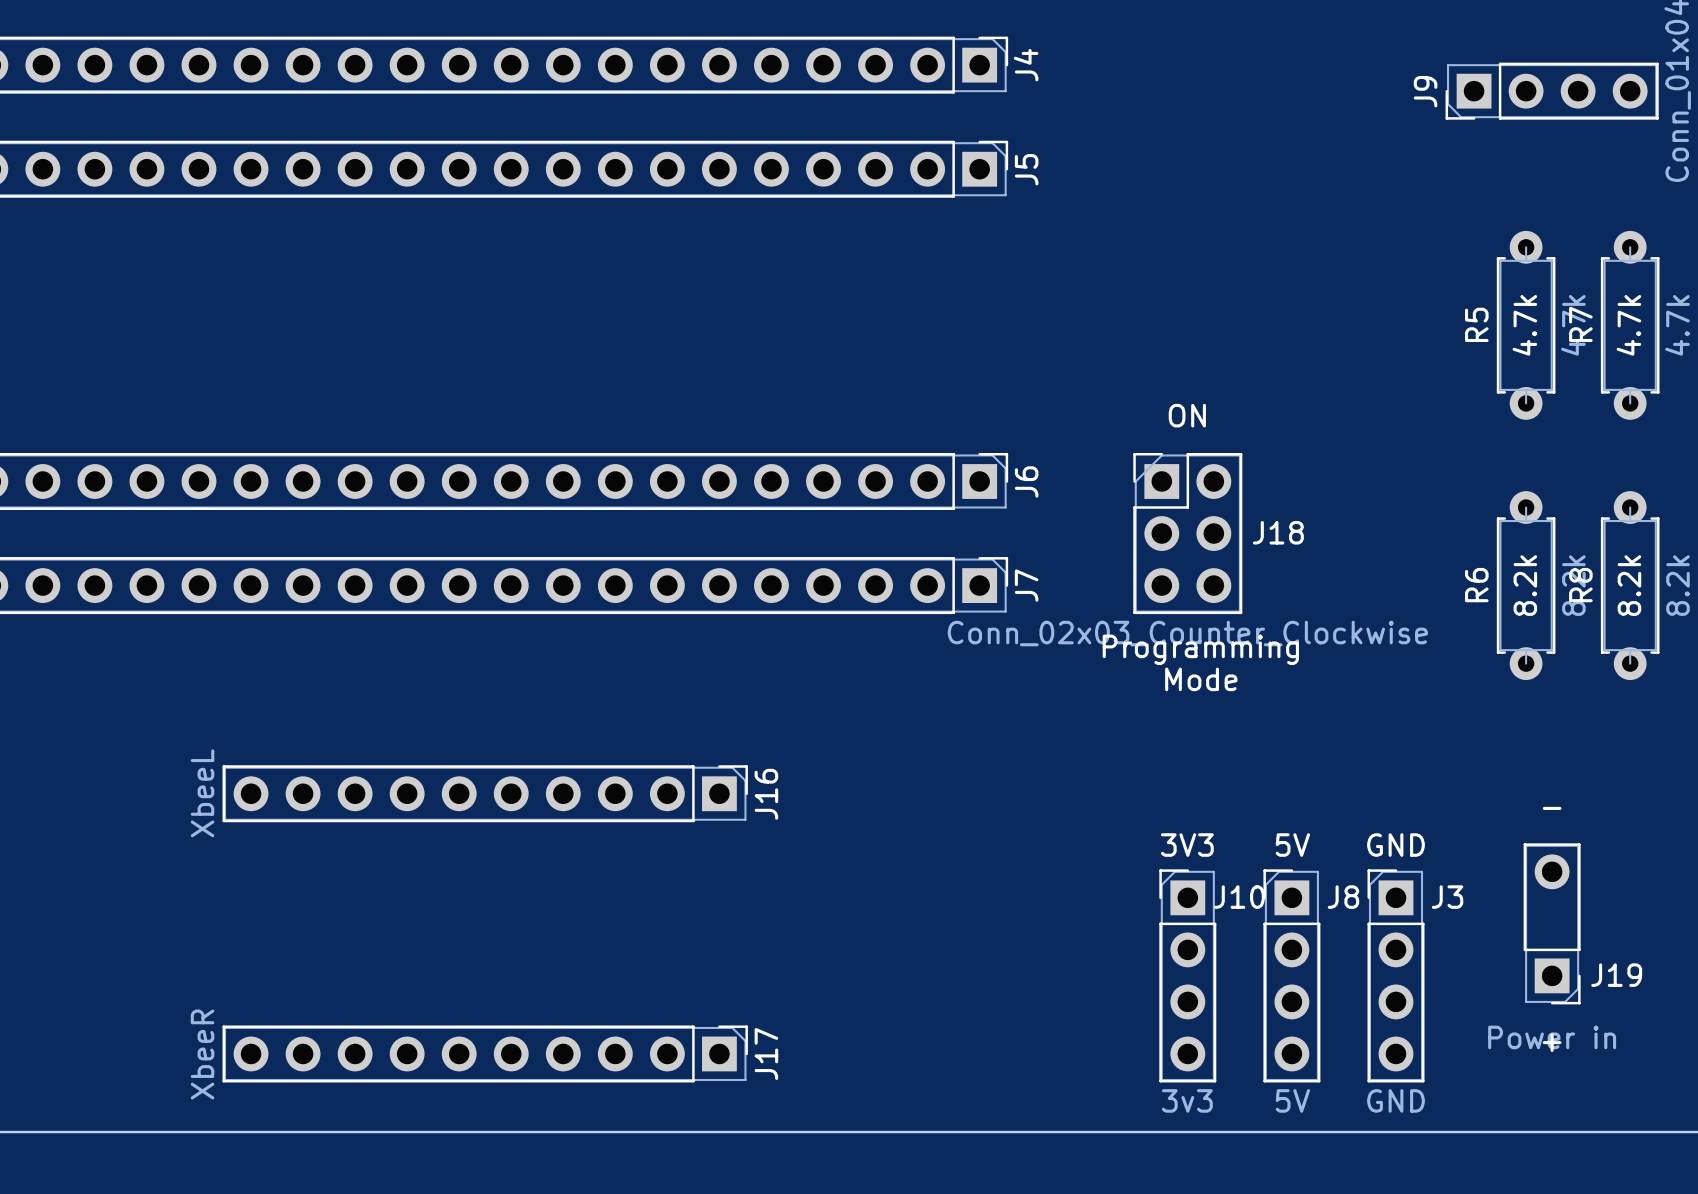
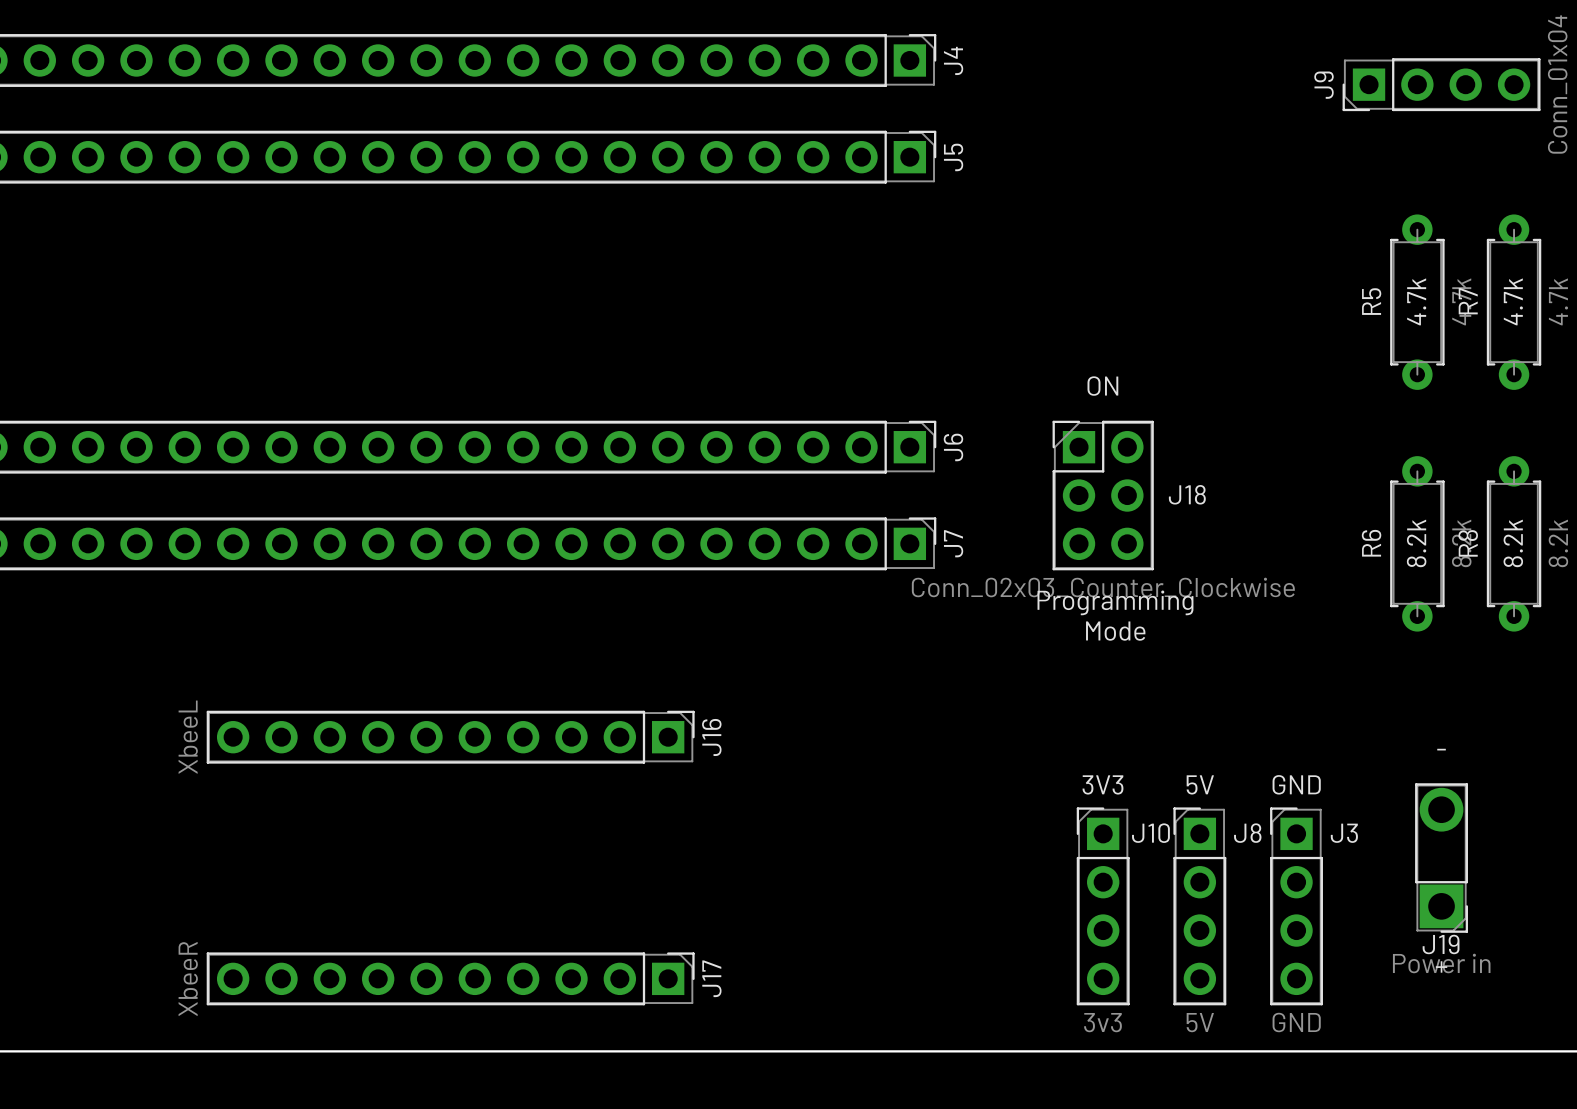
J19 footprint: [1523, 843, 1581, 1005] -> [1415, 783, 1468, 933]
J19 name position: J19 (1616, 975) -> J19 (1441, 944)

